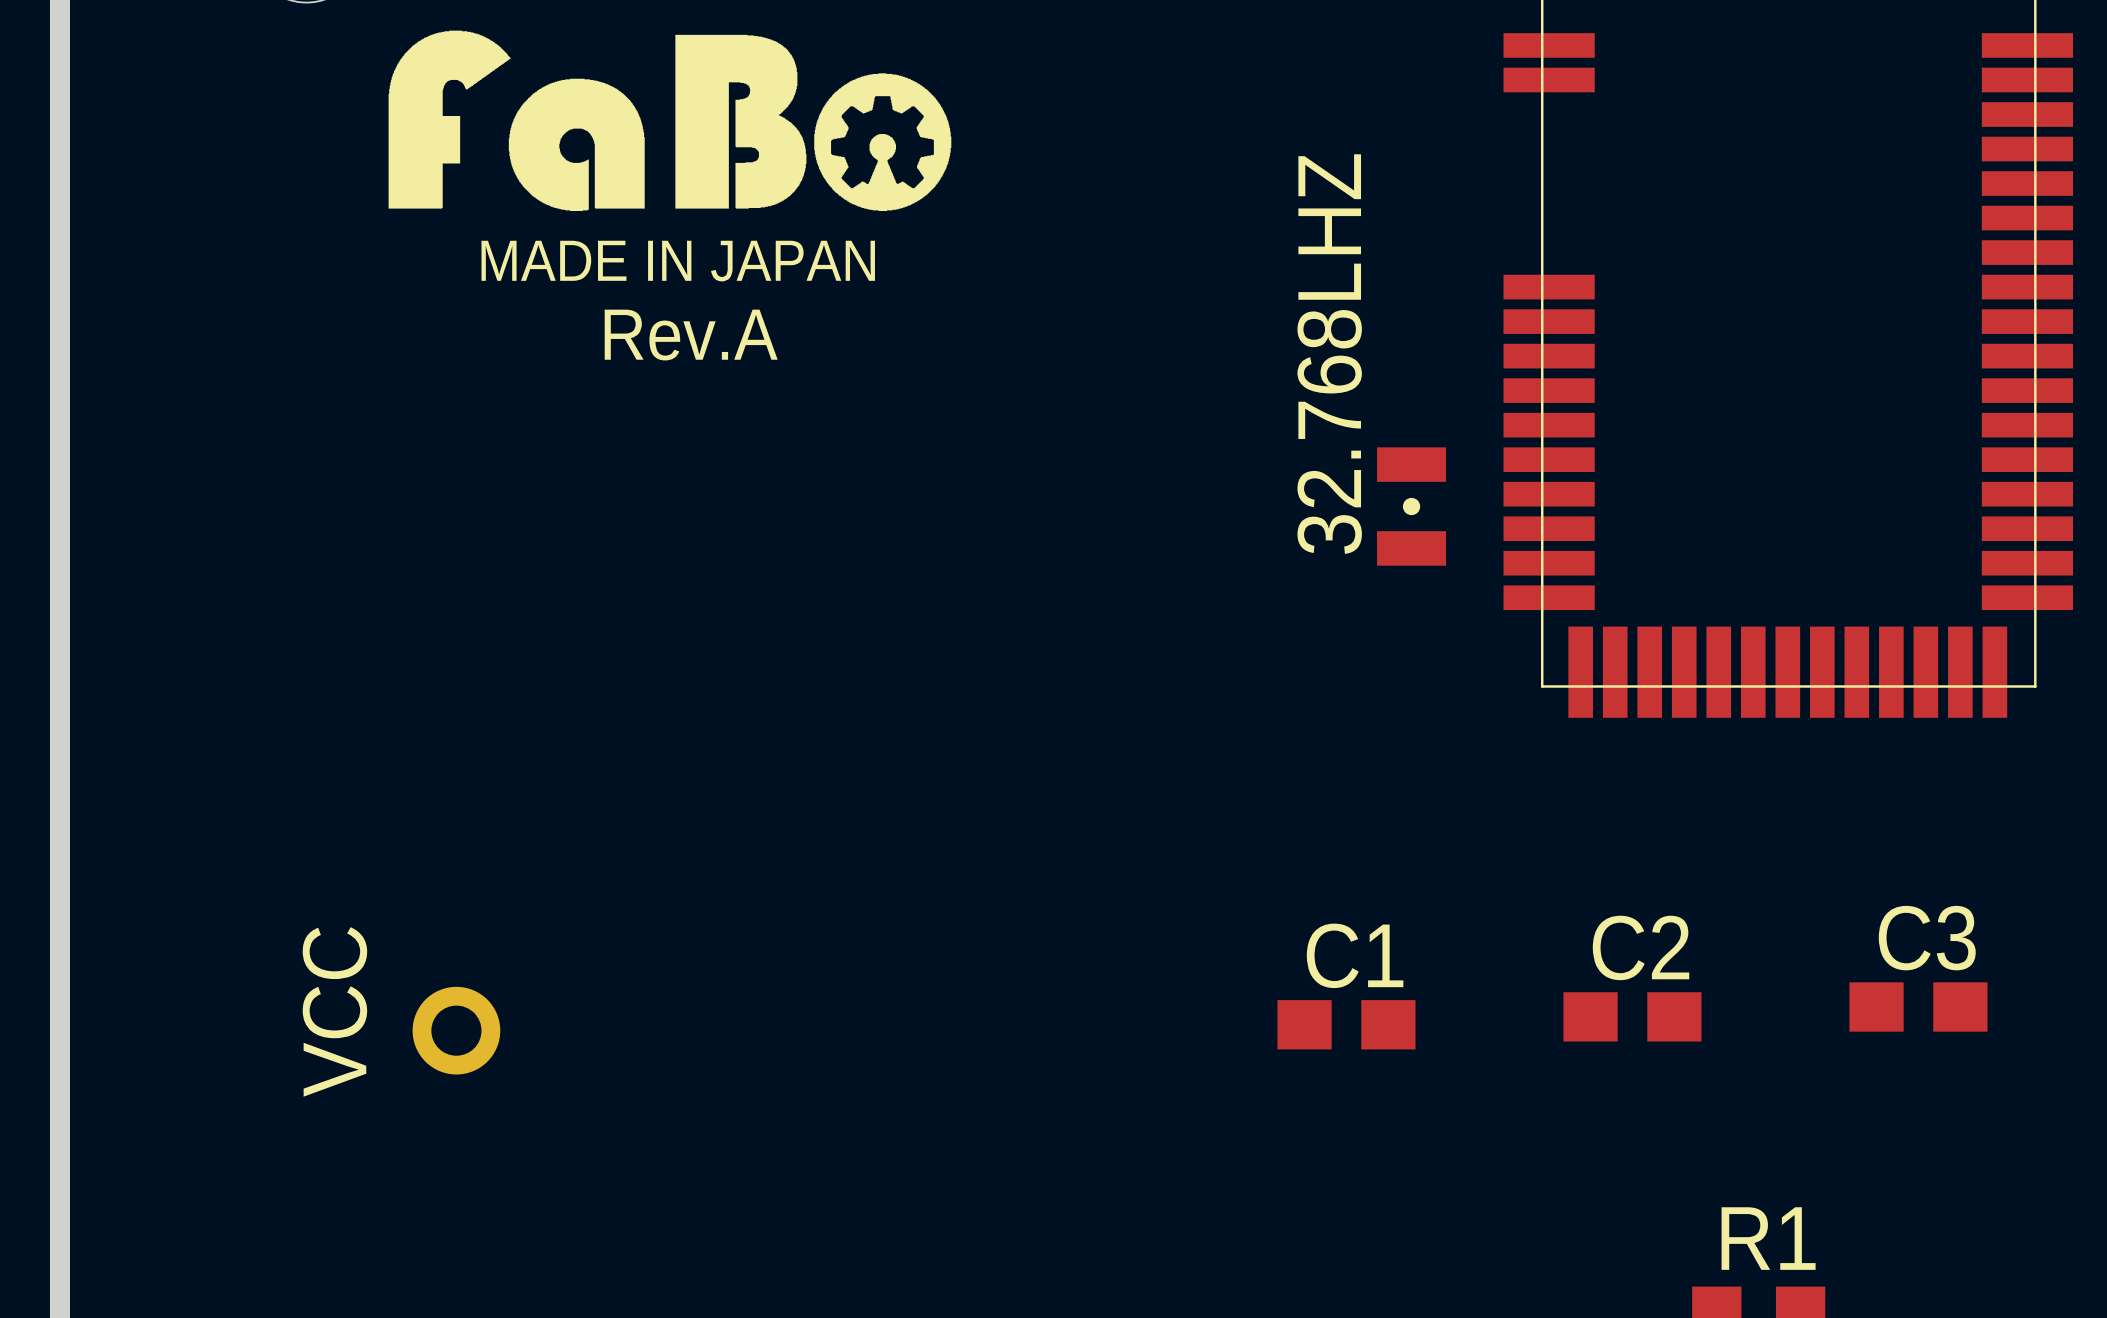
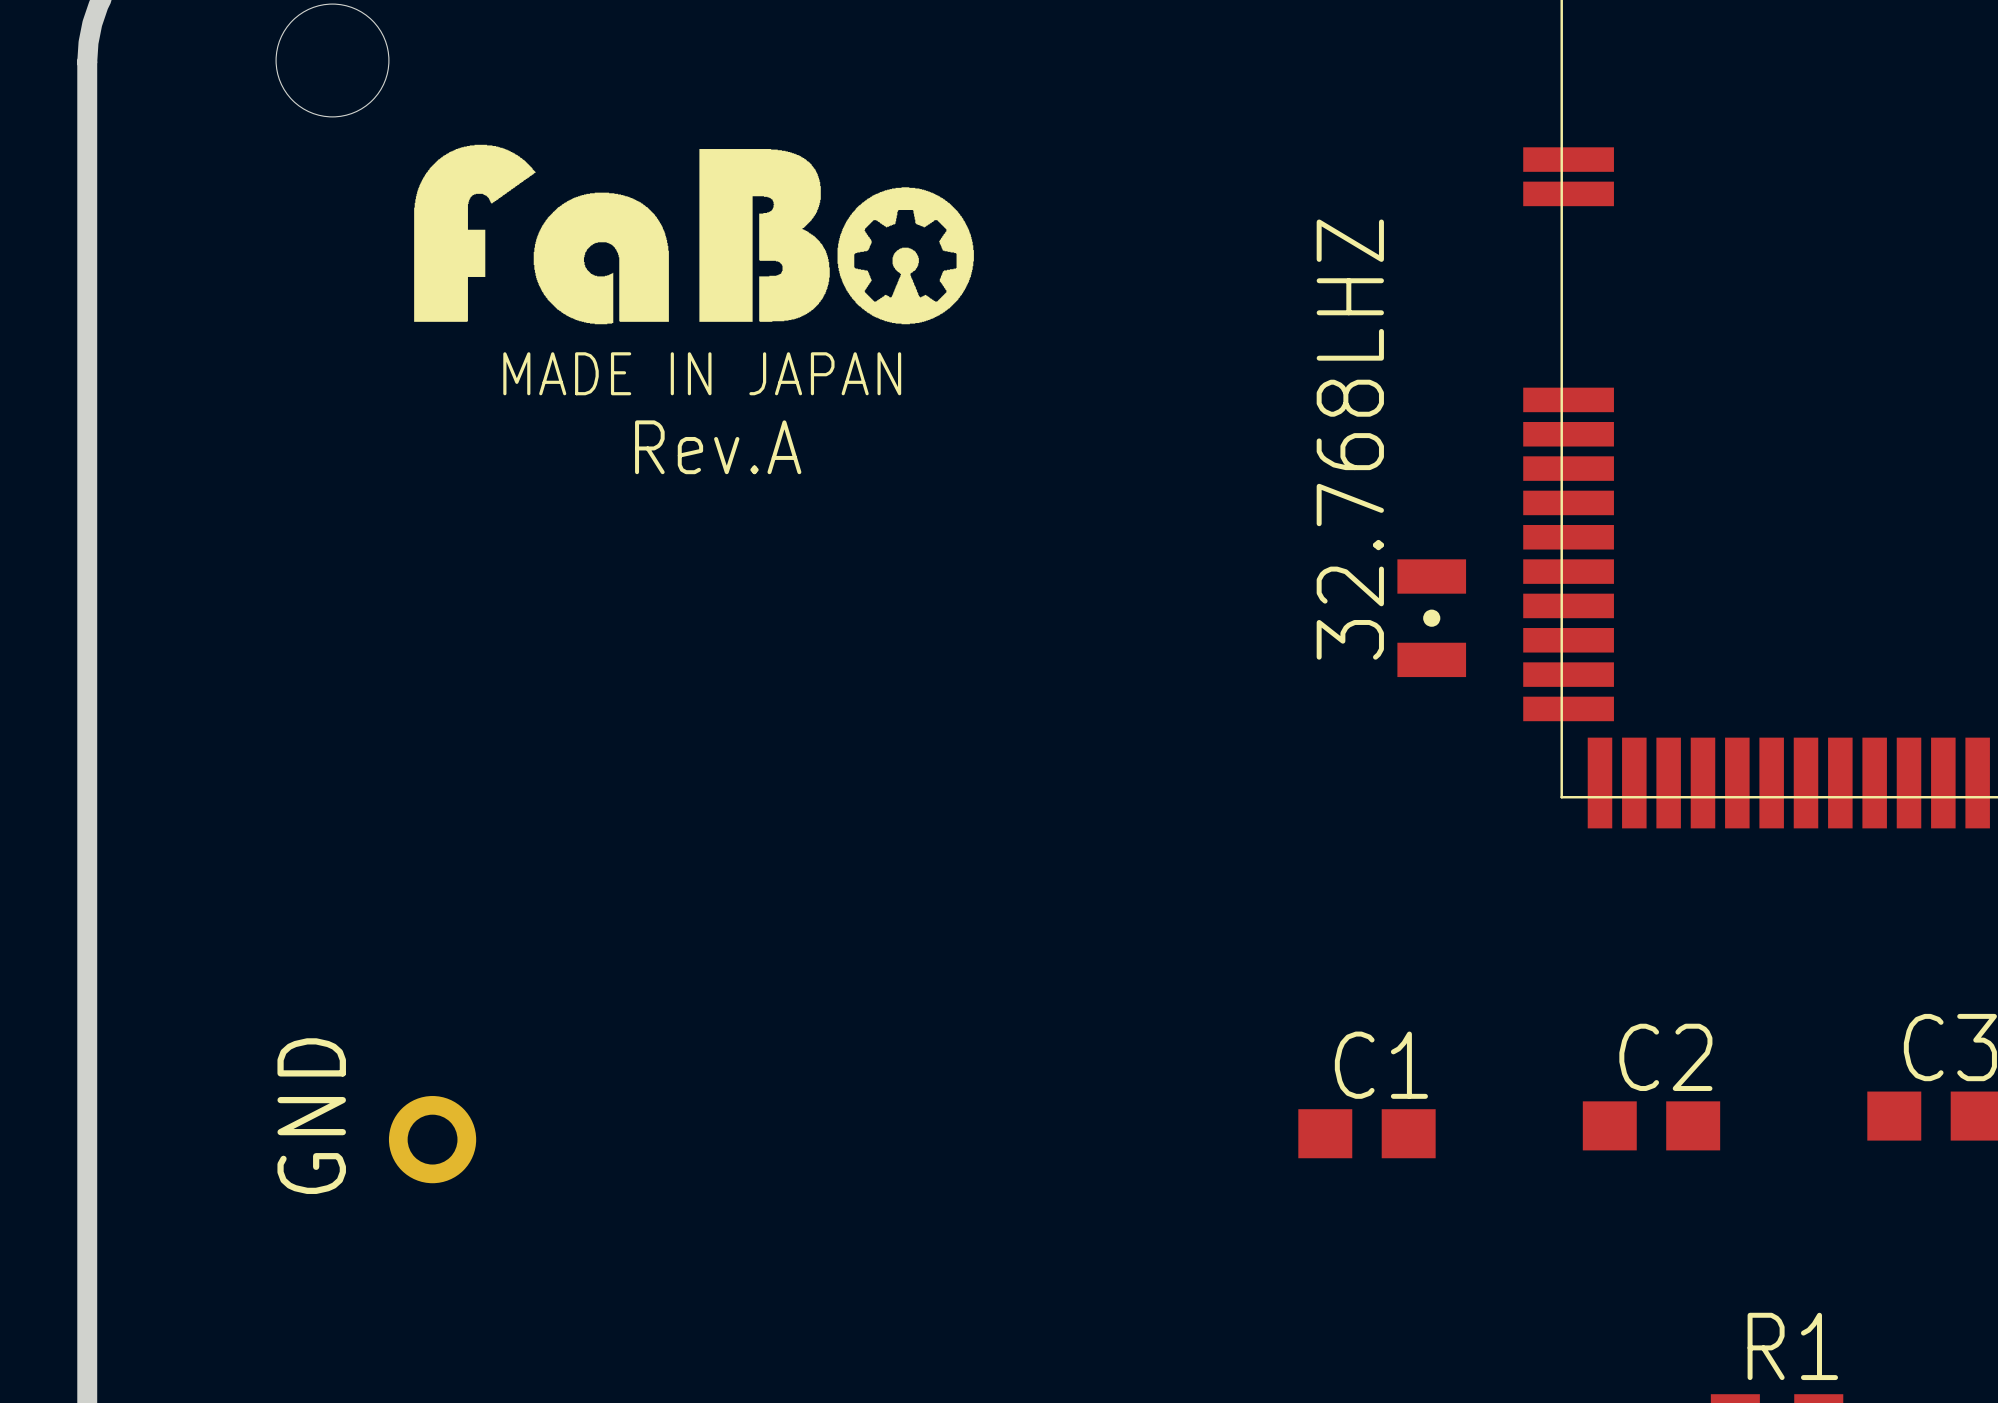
VCC name: VCC (334, 1011) -> GND (311, 1116)
VCC position: (456, 1030) -> (432, 1139)

